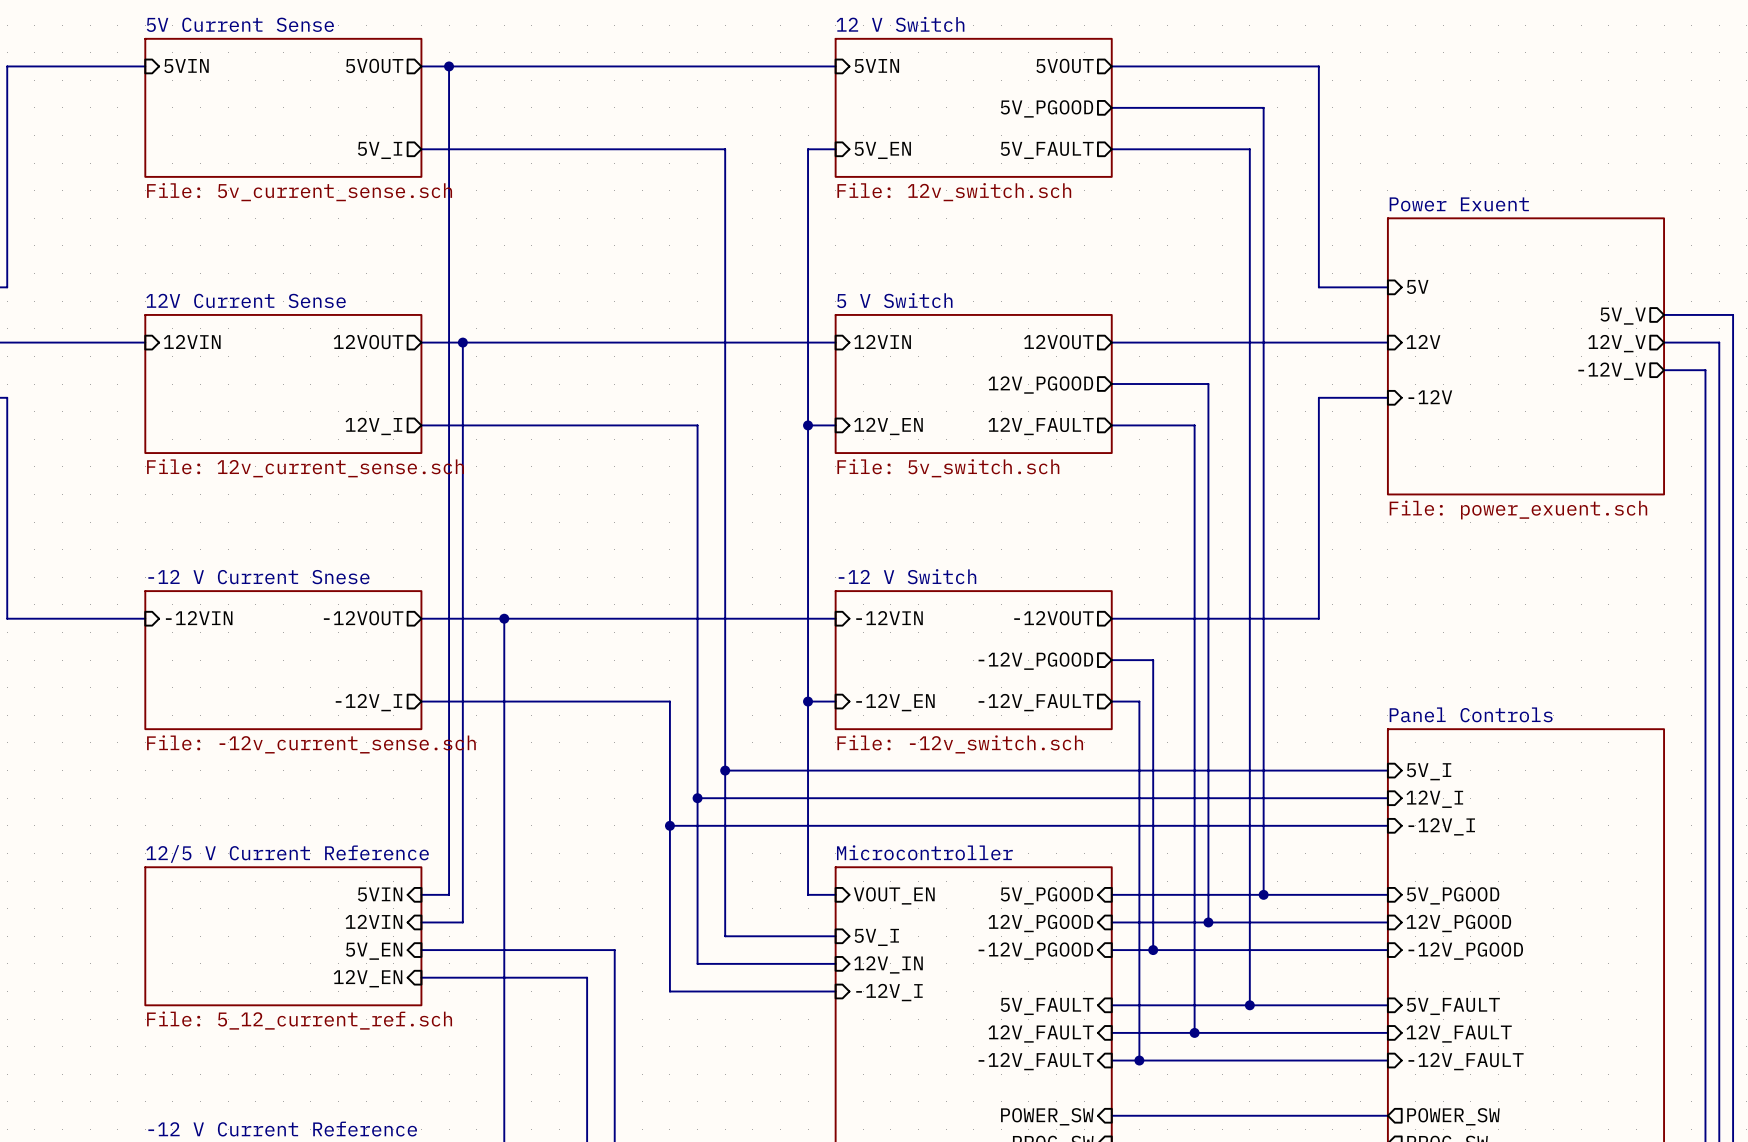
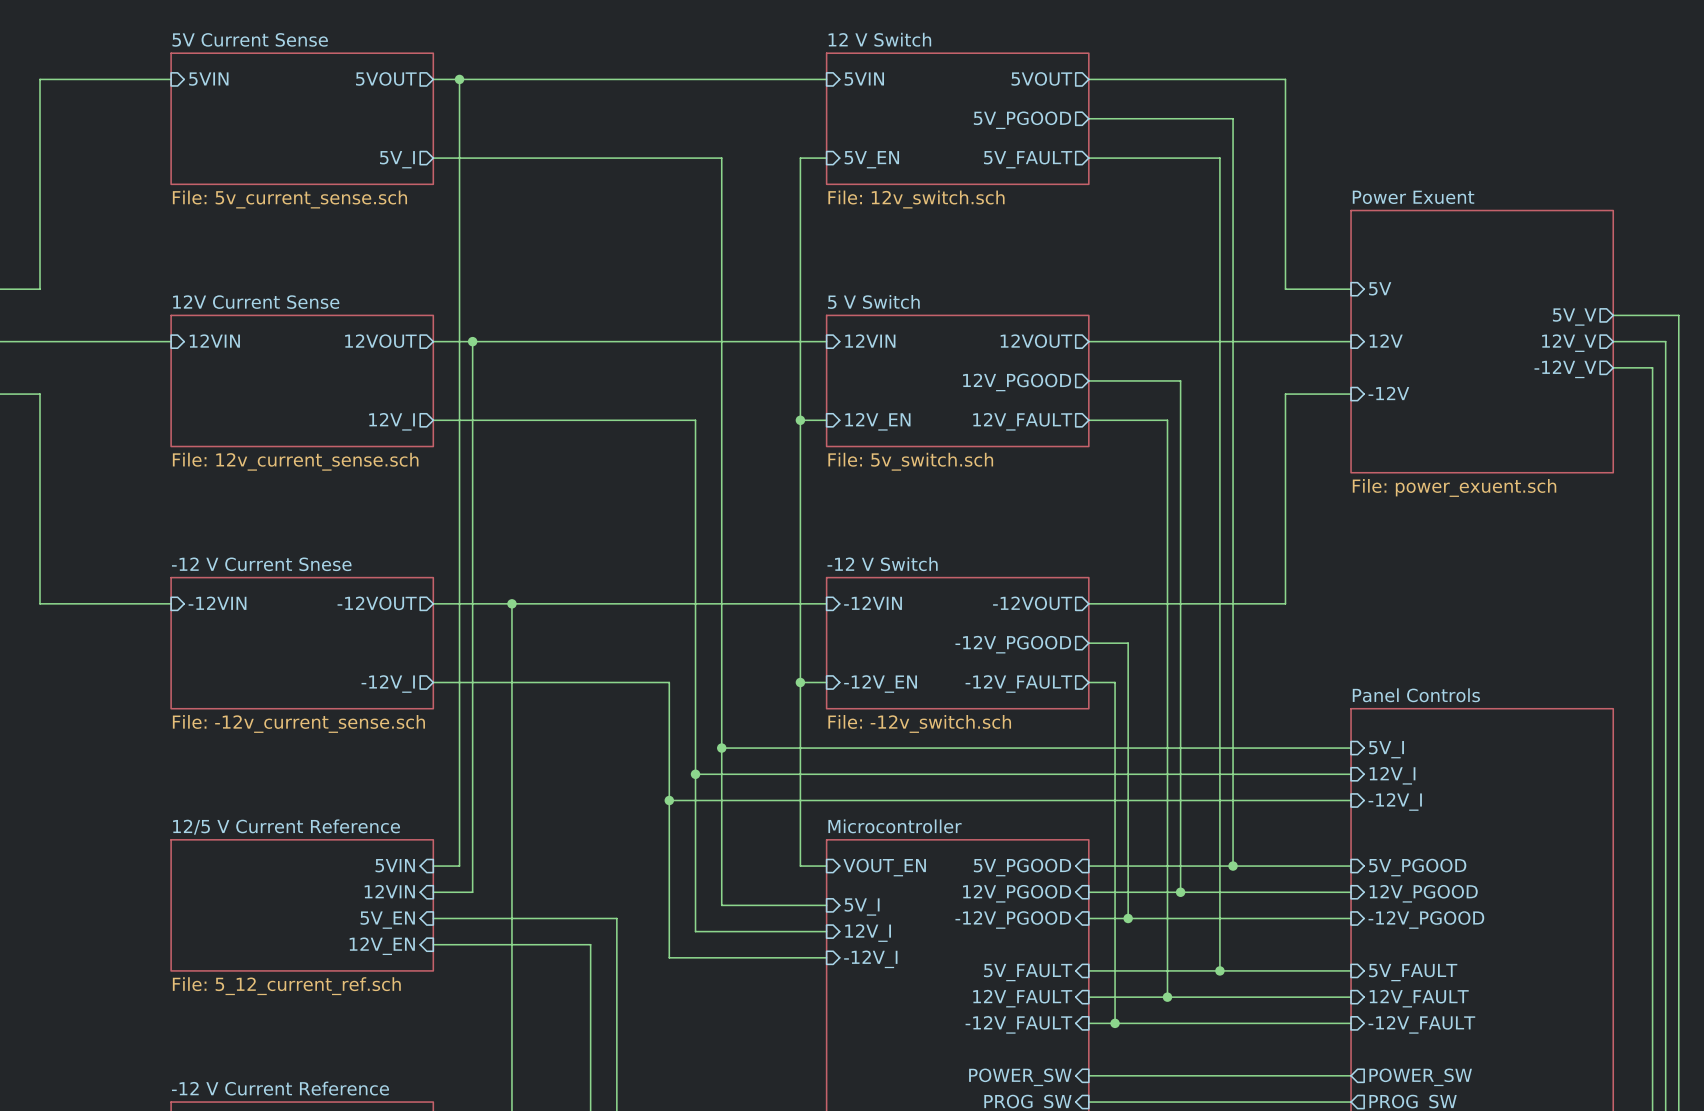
sheet Power Exuent position: (1525, 356) -> (1482, 341)
sheet pin: 12V_IN (888, 964) -> 12V_I (868, 933)

